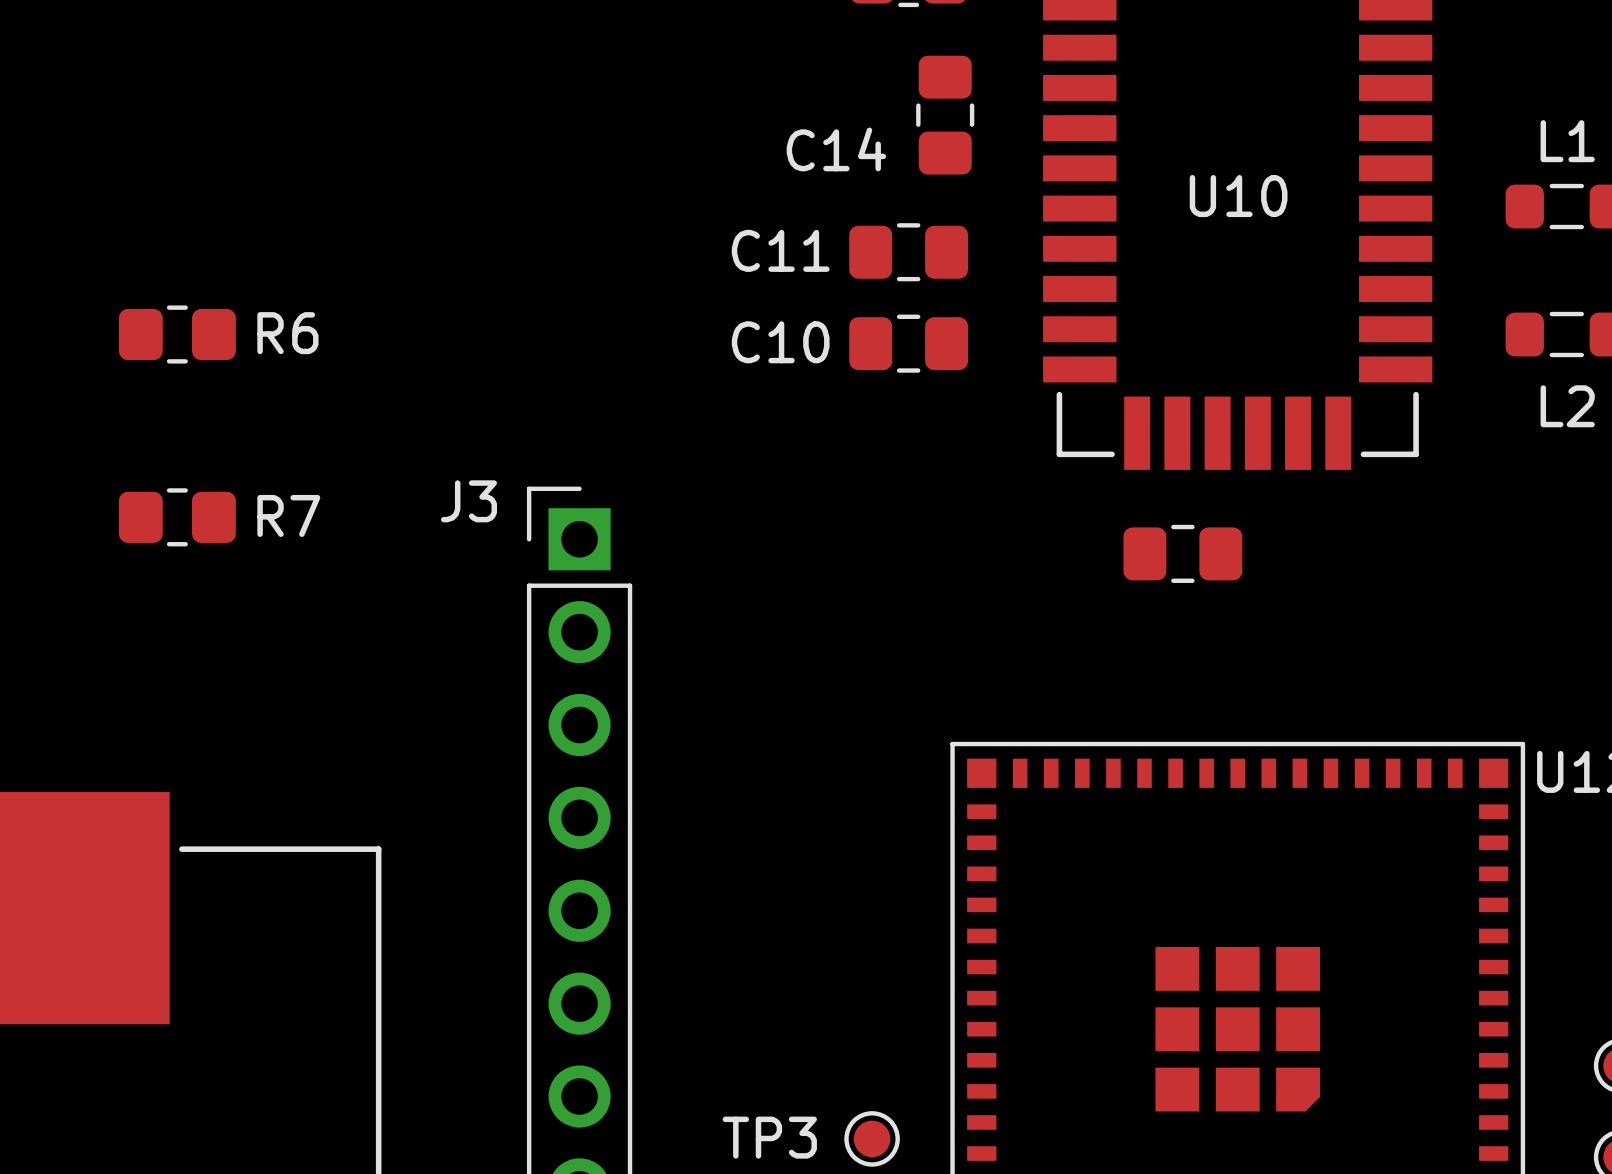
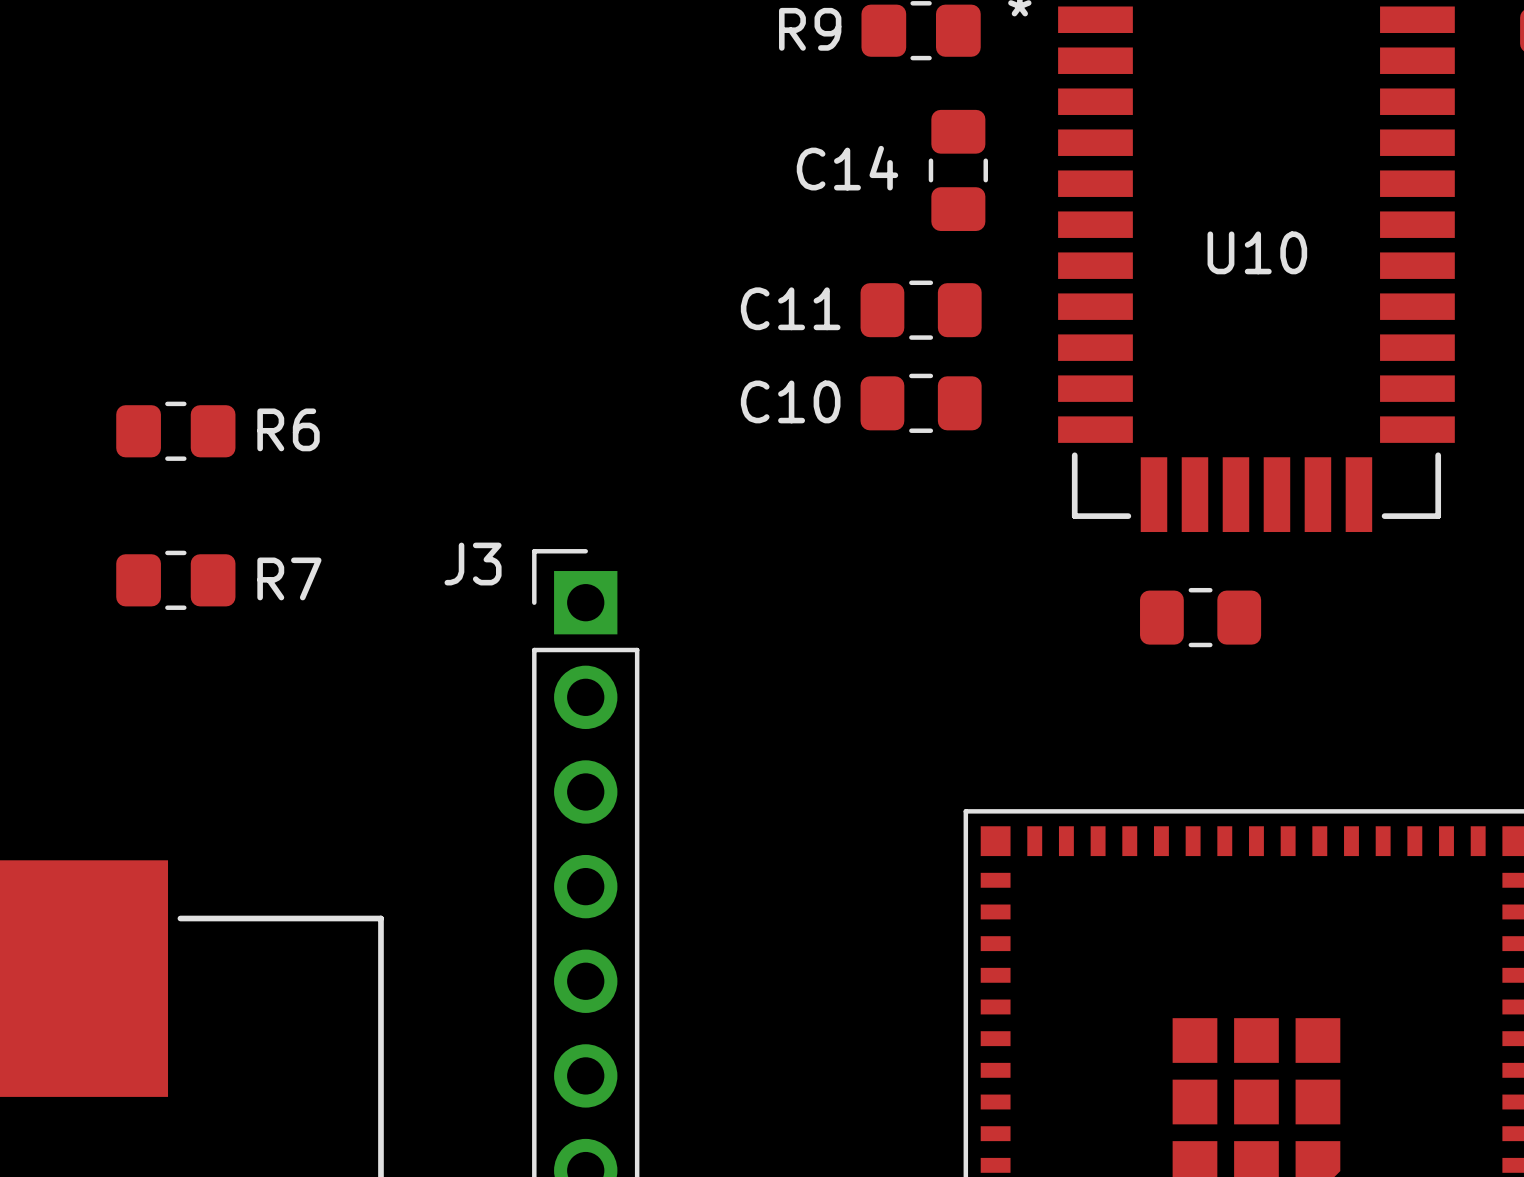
C14 name position: C14 (836, 149) -> C14 (847, 168)
R6 position: (177, 334) -> (175, 431)

